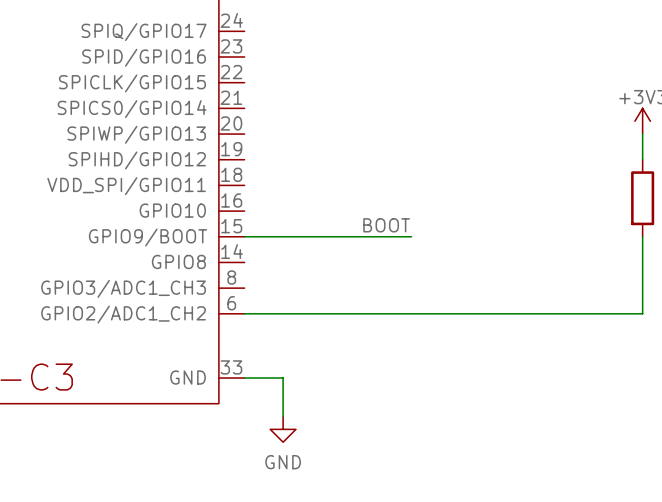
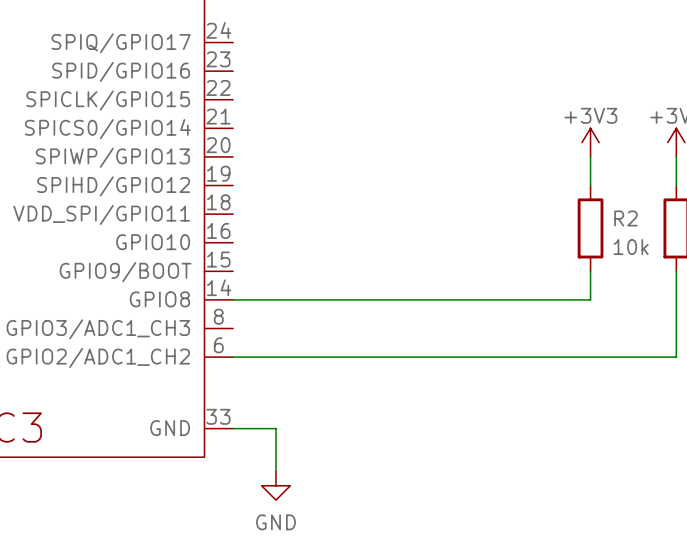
power symbol: none -> +3V3 (590, 142)
wire: none -> (590, 156) (590, 185)
R2: none -> 10k (590, 228)
label: BOOT (386, 225) -> none
wire: (244, 236) (411, 236) -> none
wire: none -> (590, 271) (590, 299) (233, 299)

